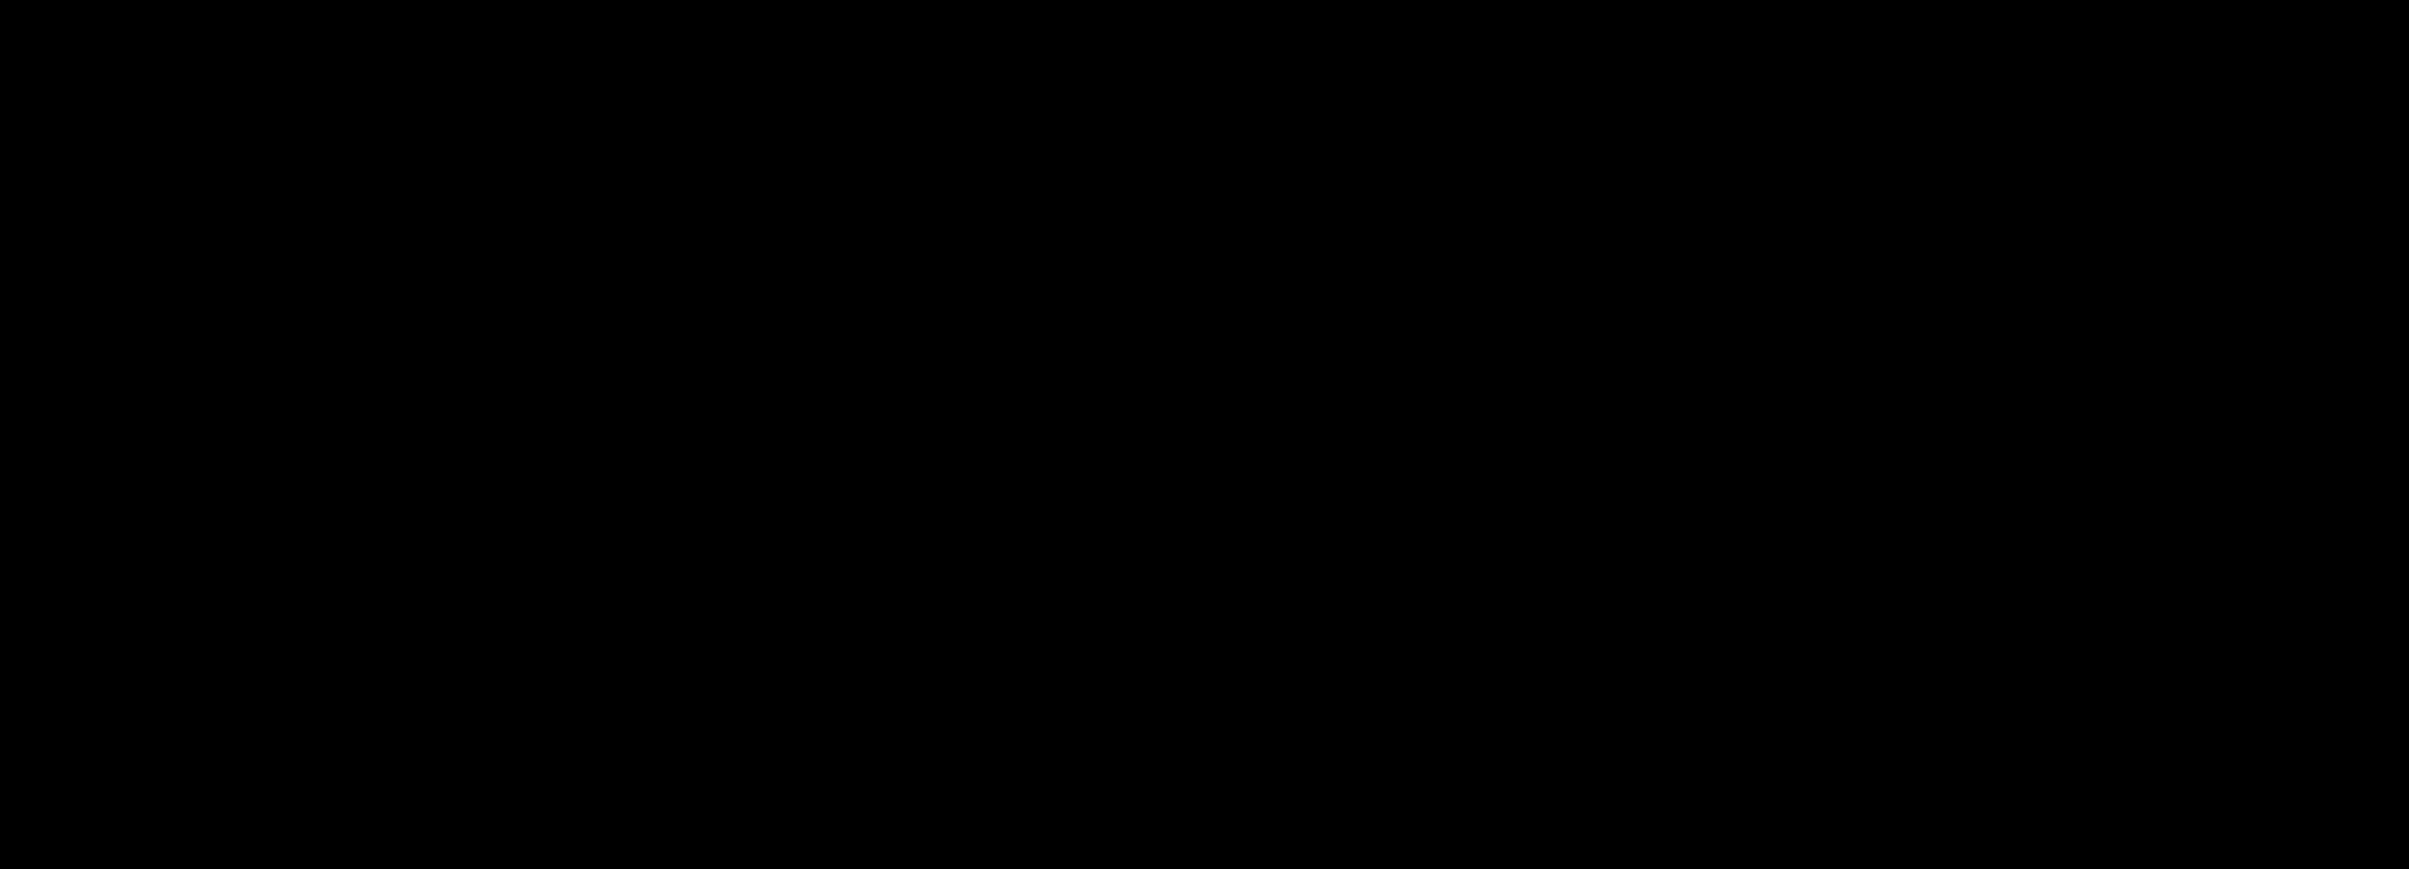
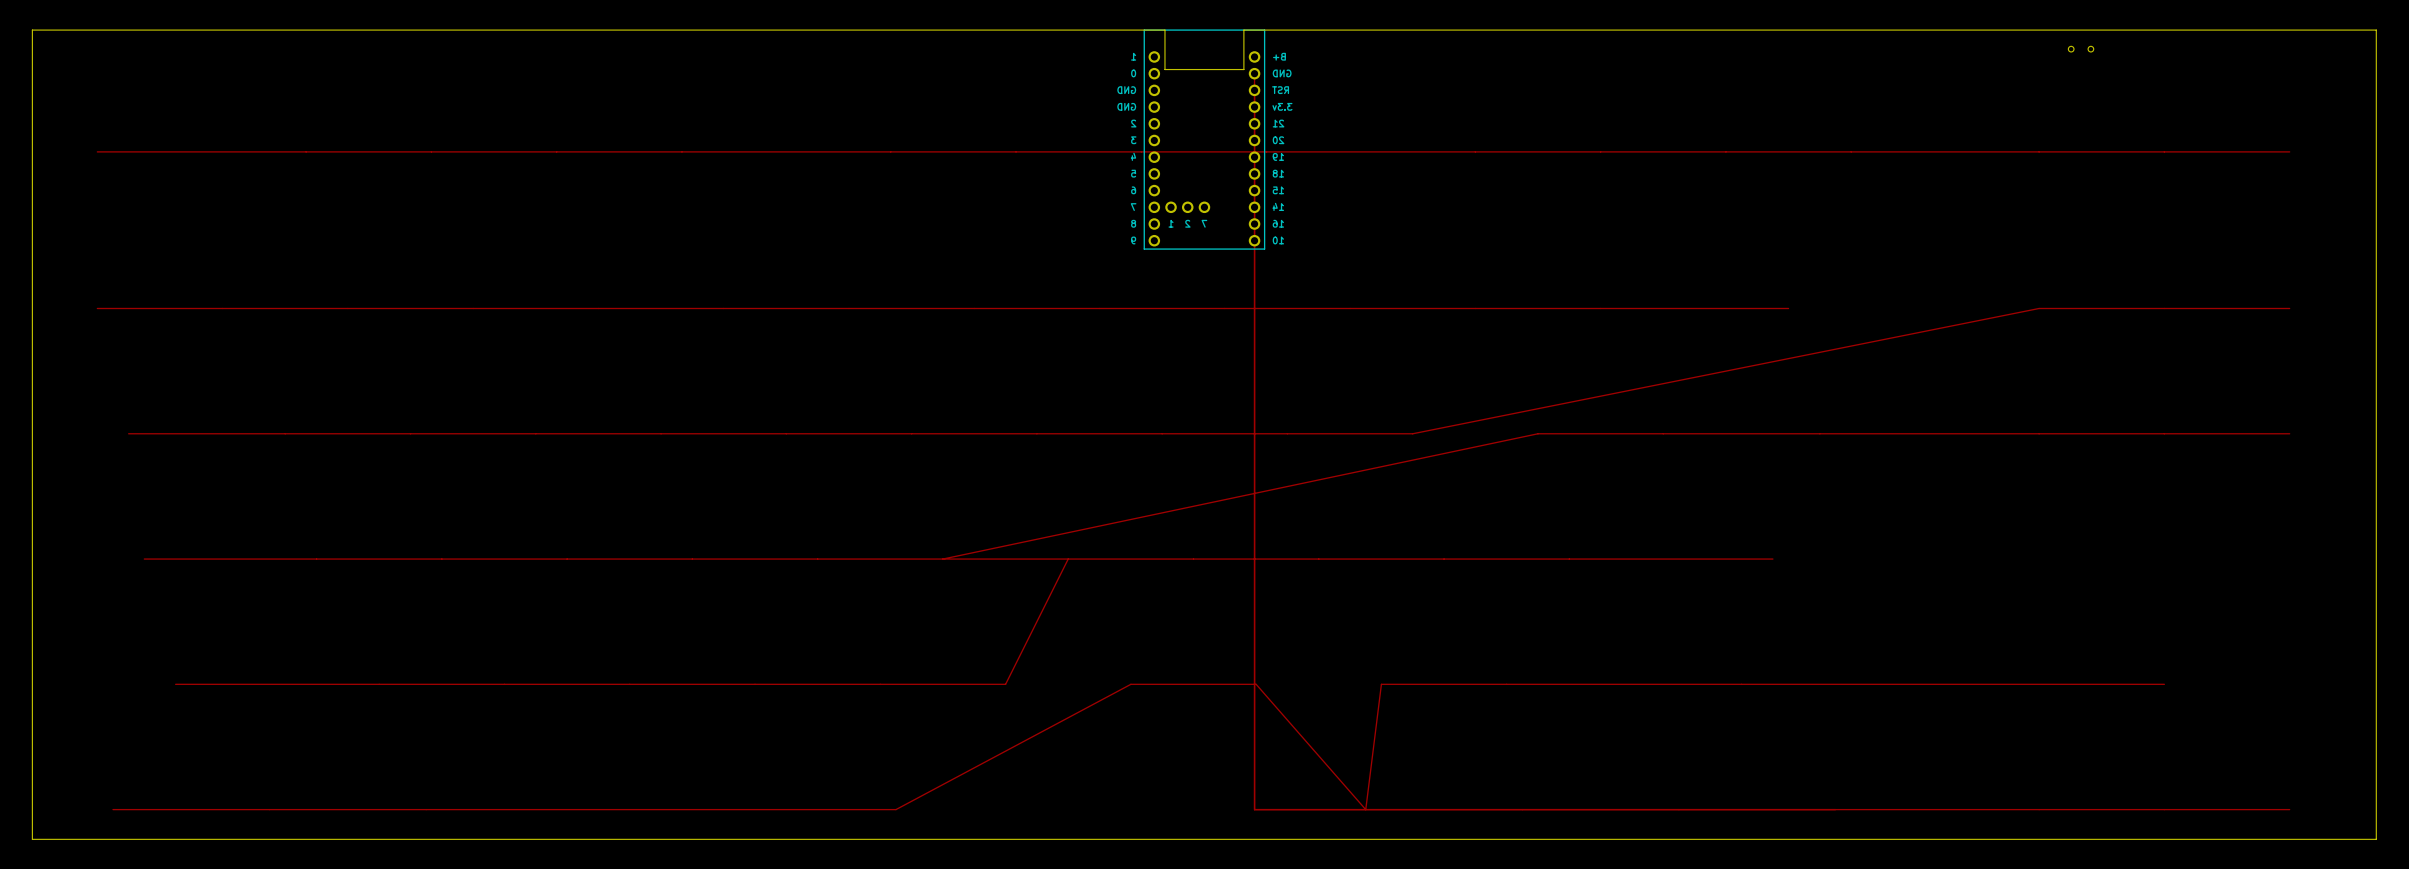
board edge: none -> (32, 30) (1164, 30) (1164, 69) (1243, 69) (1243, 30) (2376, 30) (2376, 839) (32, 839) (32, 30)
part: none -> (2081, 49)
track: none -> (1254, 73) (1254, 809) (2289, 809)
part: none -> (1204, 139)
track: none -> (97, 151) (2289, 151)
track: none -> (97, 308) (1788, 308)
track: none -> (2289, 308) (2039, 308) (1412, 433) (128, 433)
track: none -> (2289, 433) (1538, 433) (942, 559)
track: none -> (144, 559) (1772, 559)
track: none -> (1068, 559) (1005, 684) (175, 684)
track: none -> (2164, 684) (1381, 684) (1365, 809) (1256, 684) (1130, 684) (895, 809) (112, 809)

